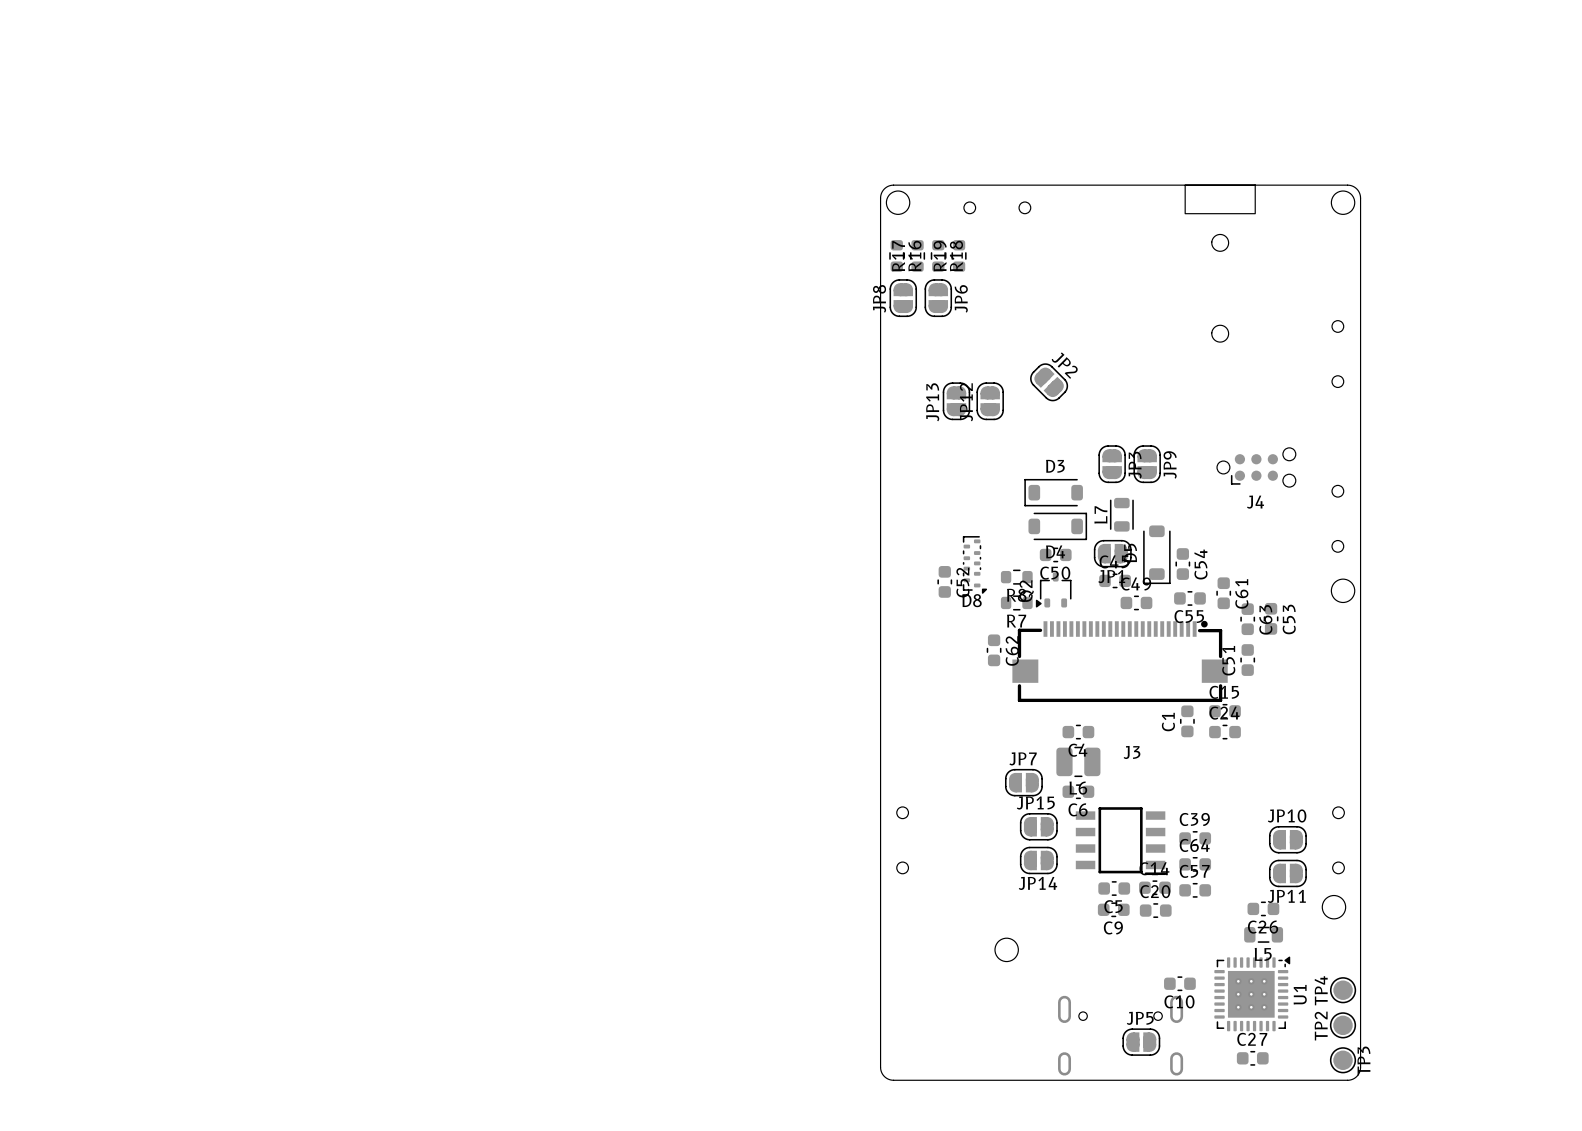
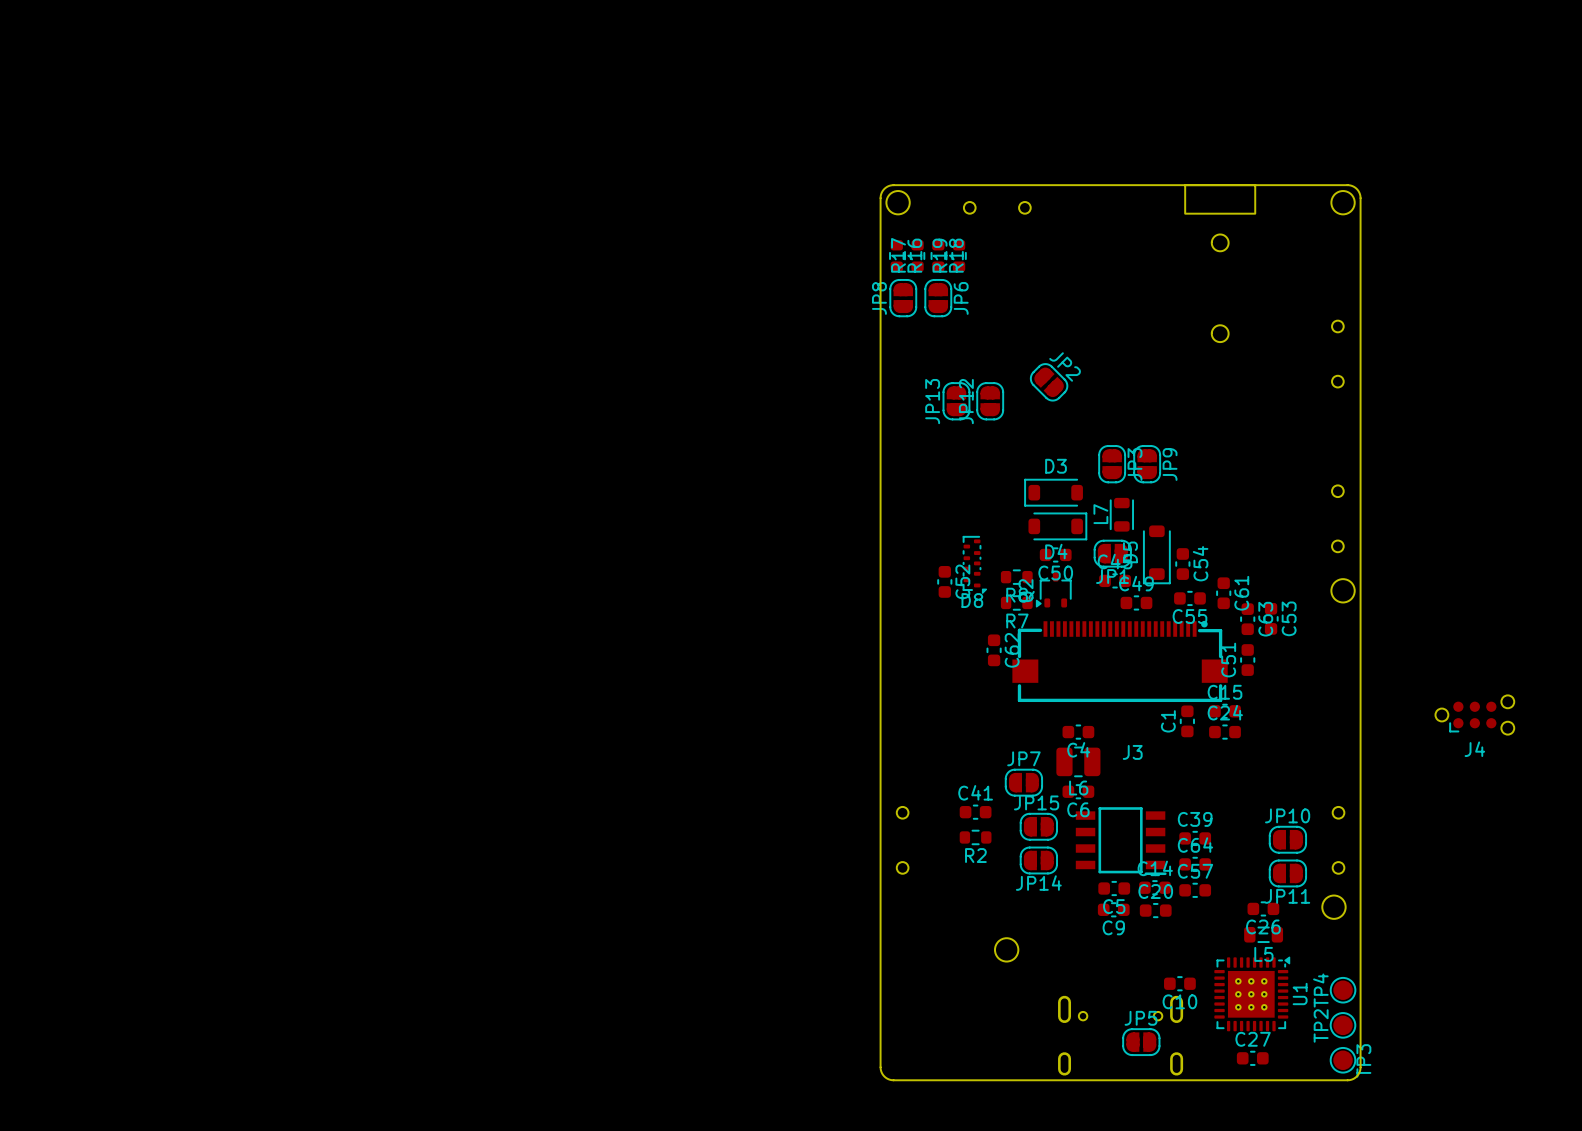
J4 position: (1256, 467) -> (1474, 714)
C41: none -> (975, 812)
R2: none -> (975, 837)

